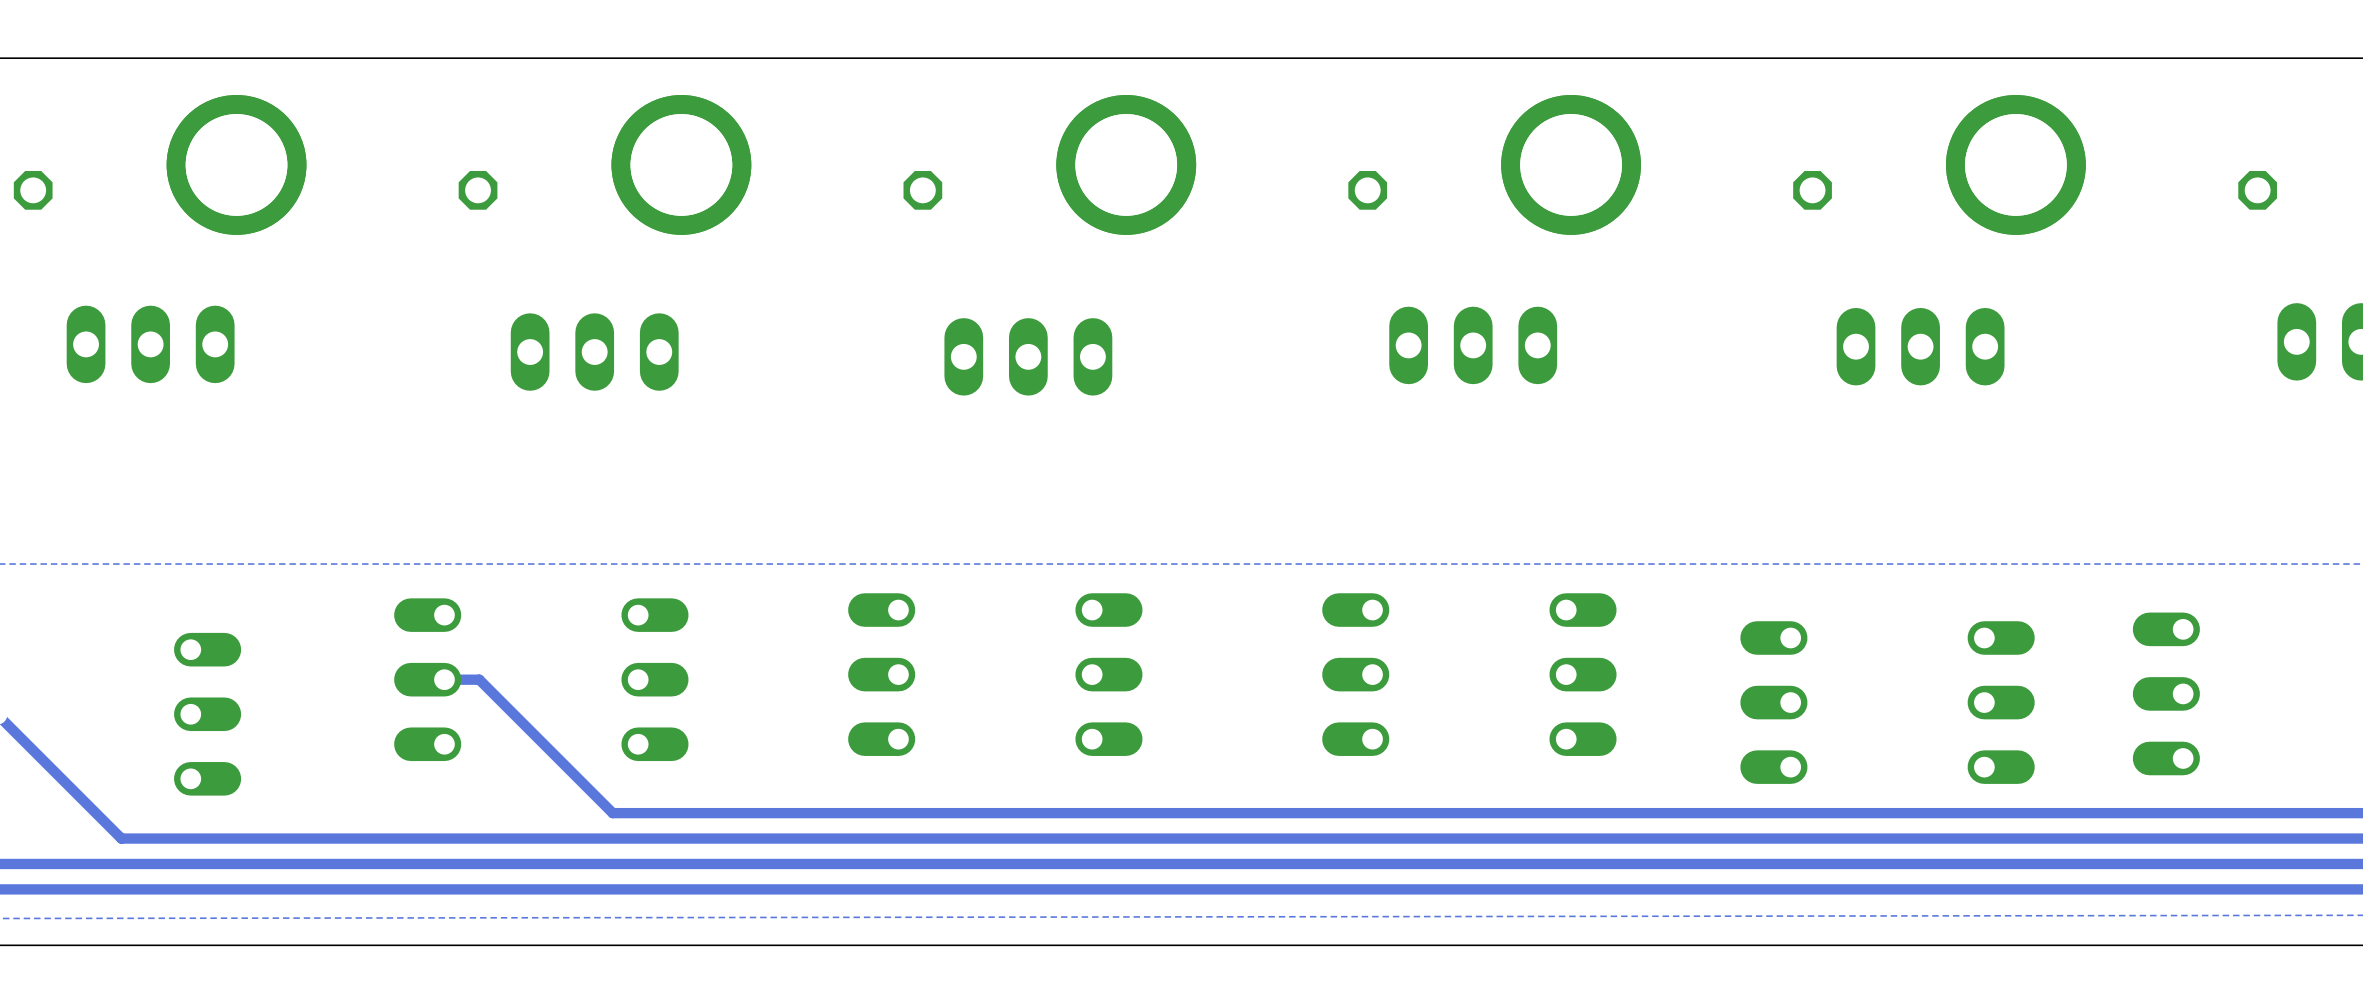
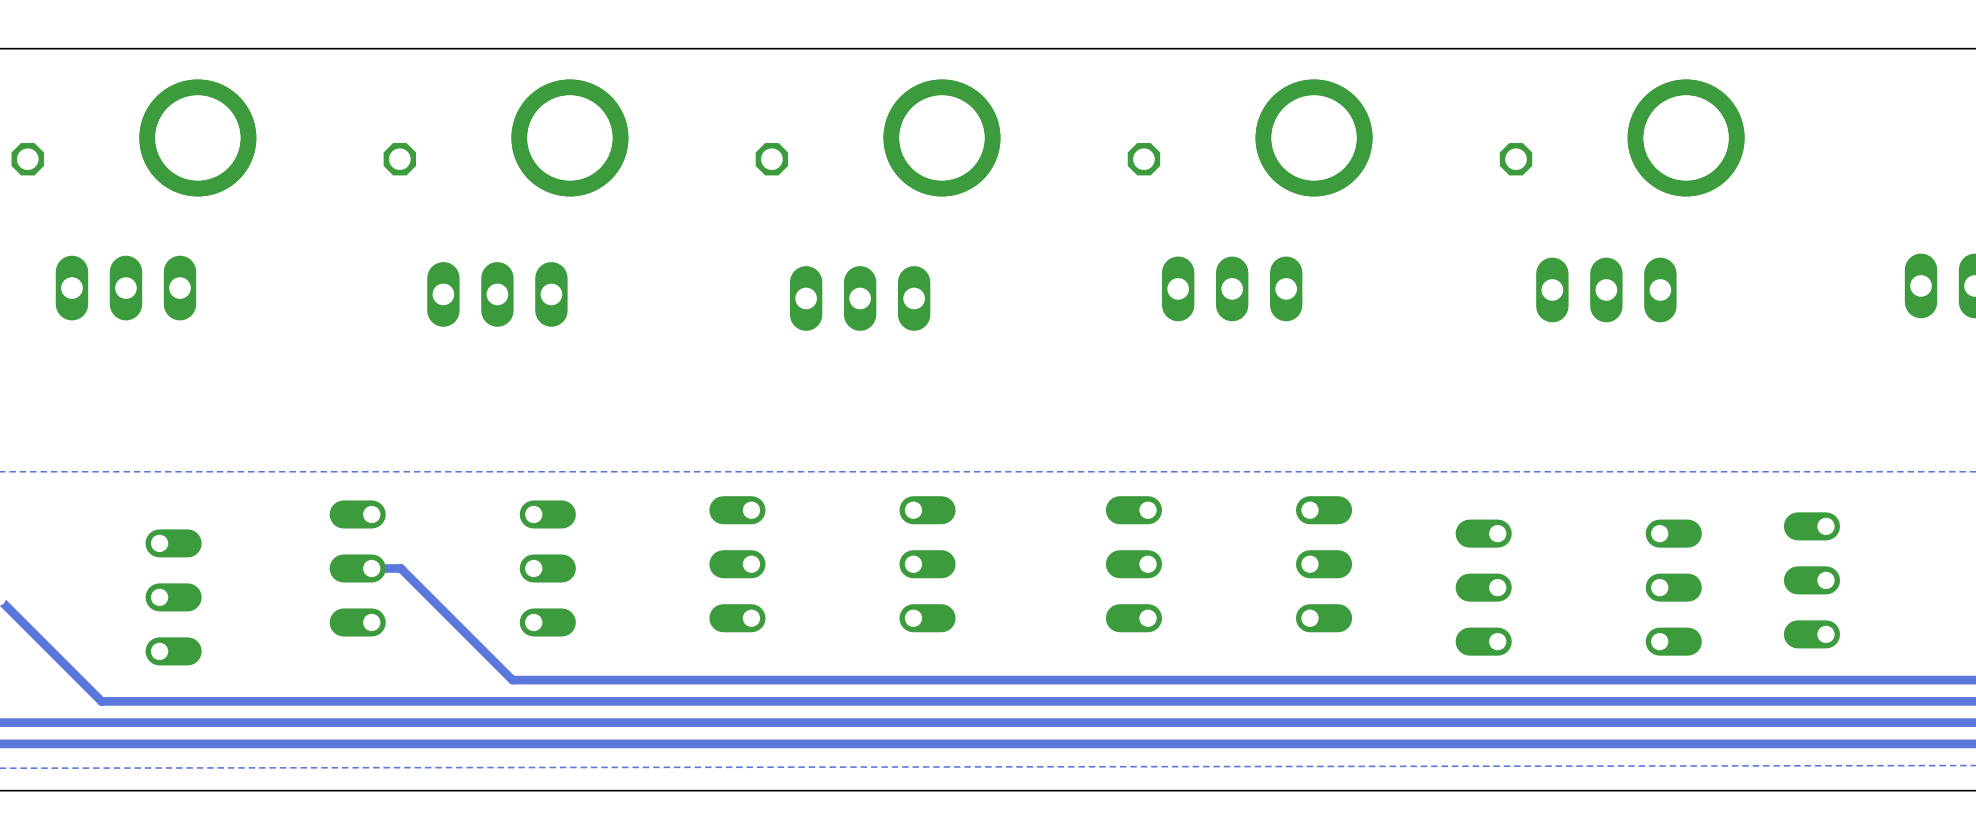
part: (2257, 190) -> none

